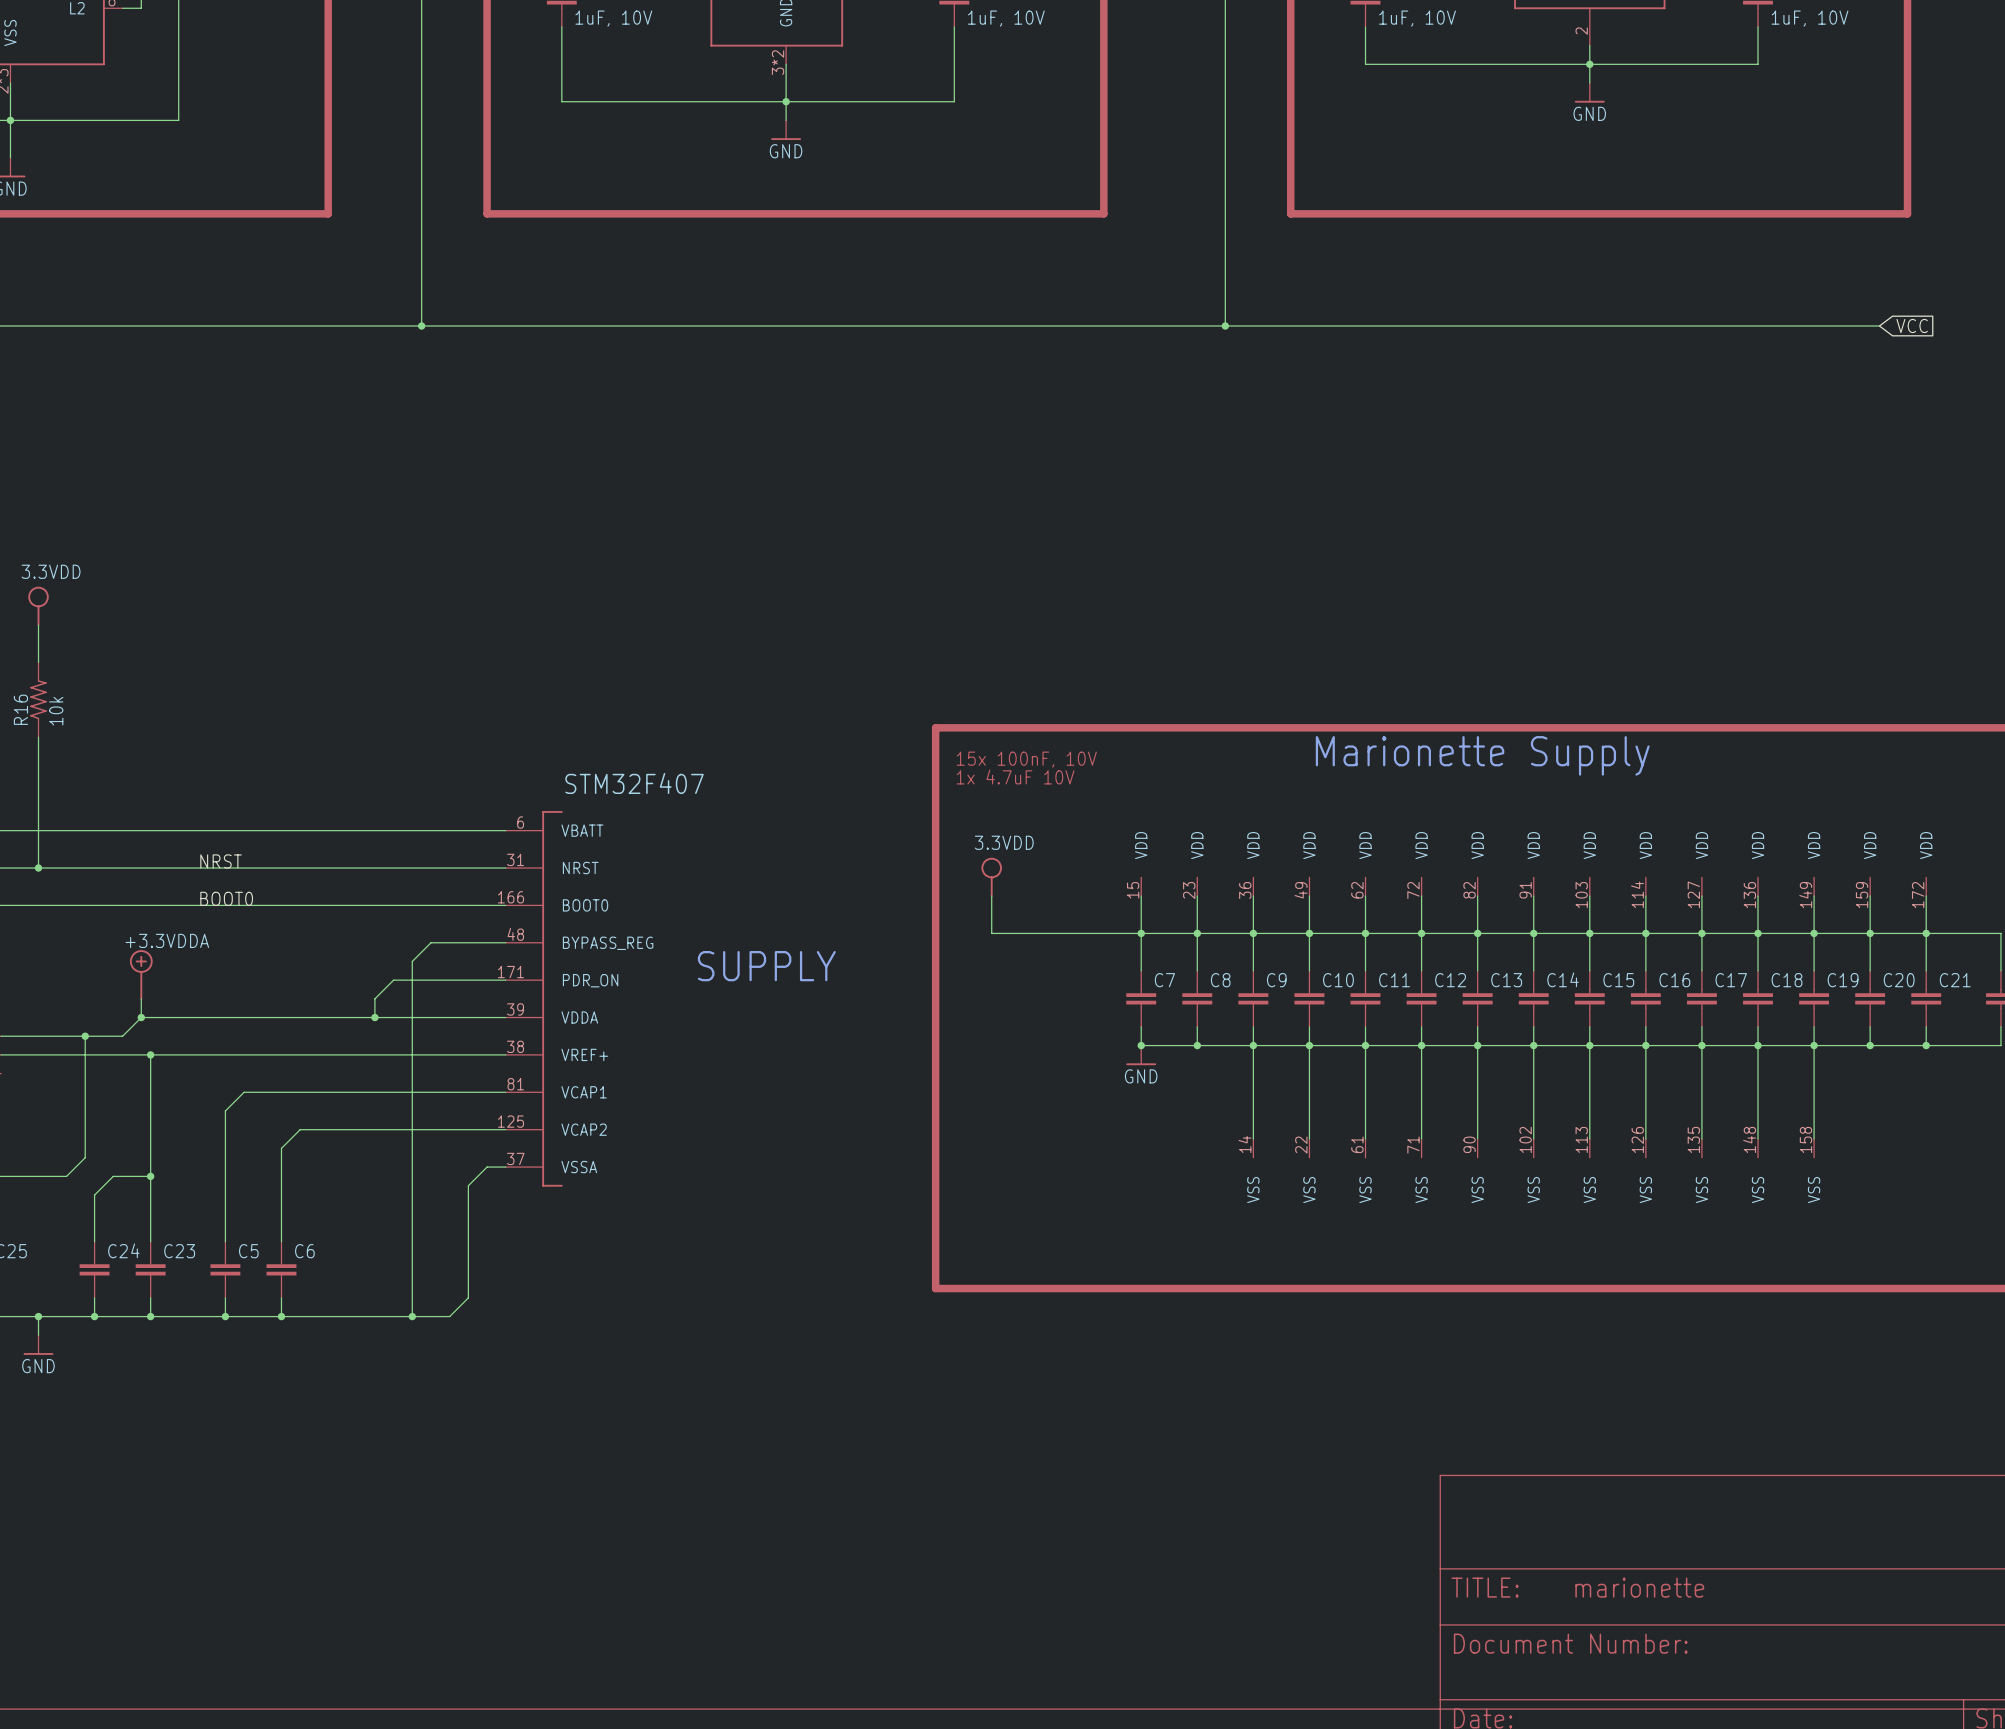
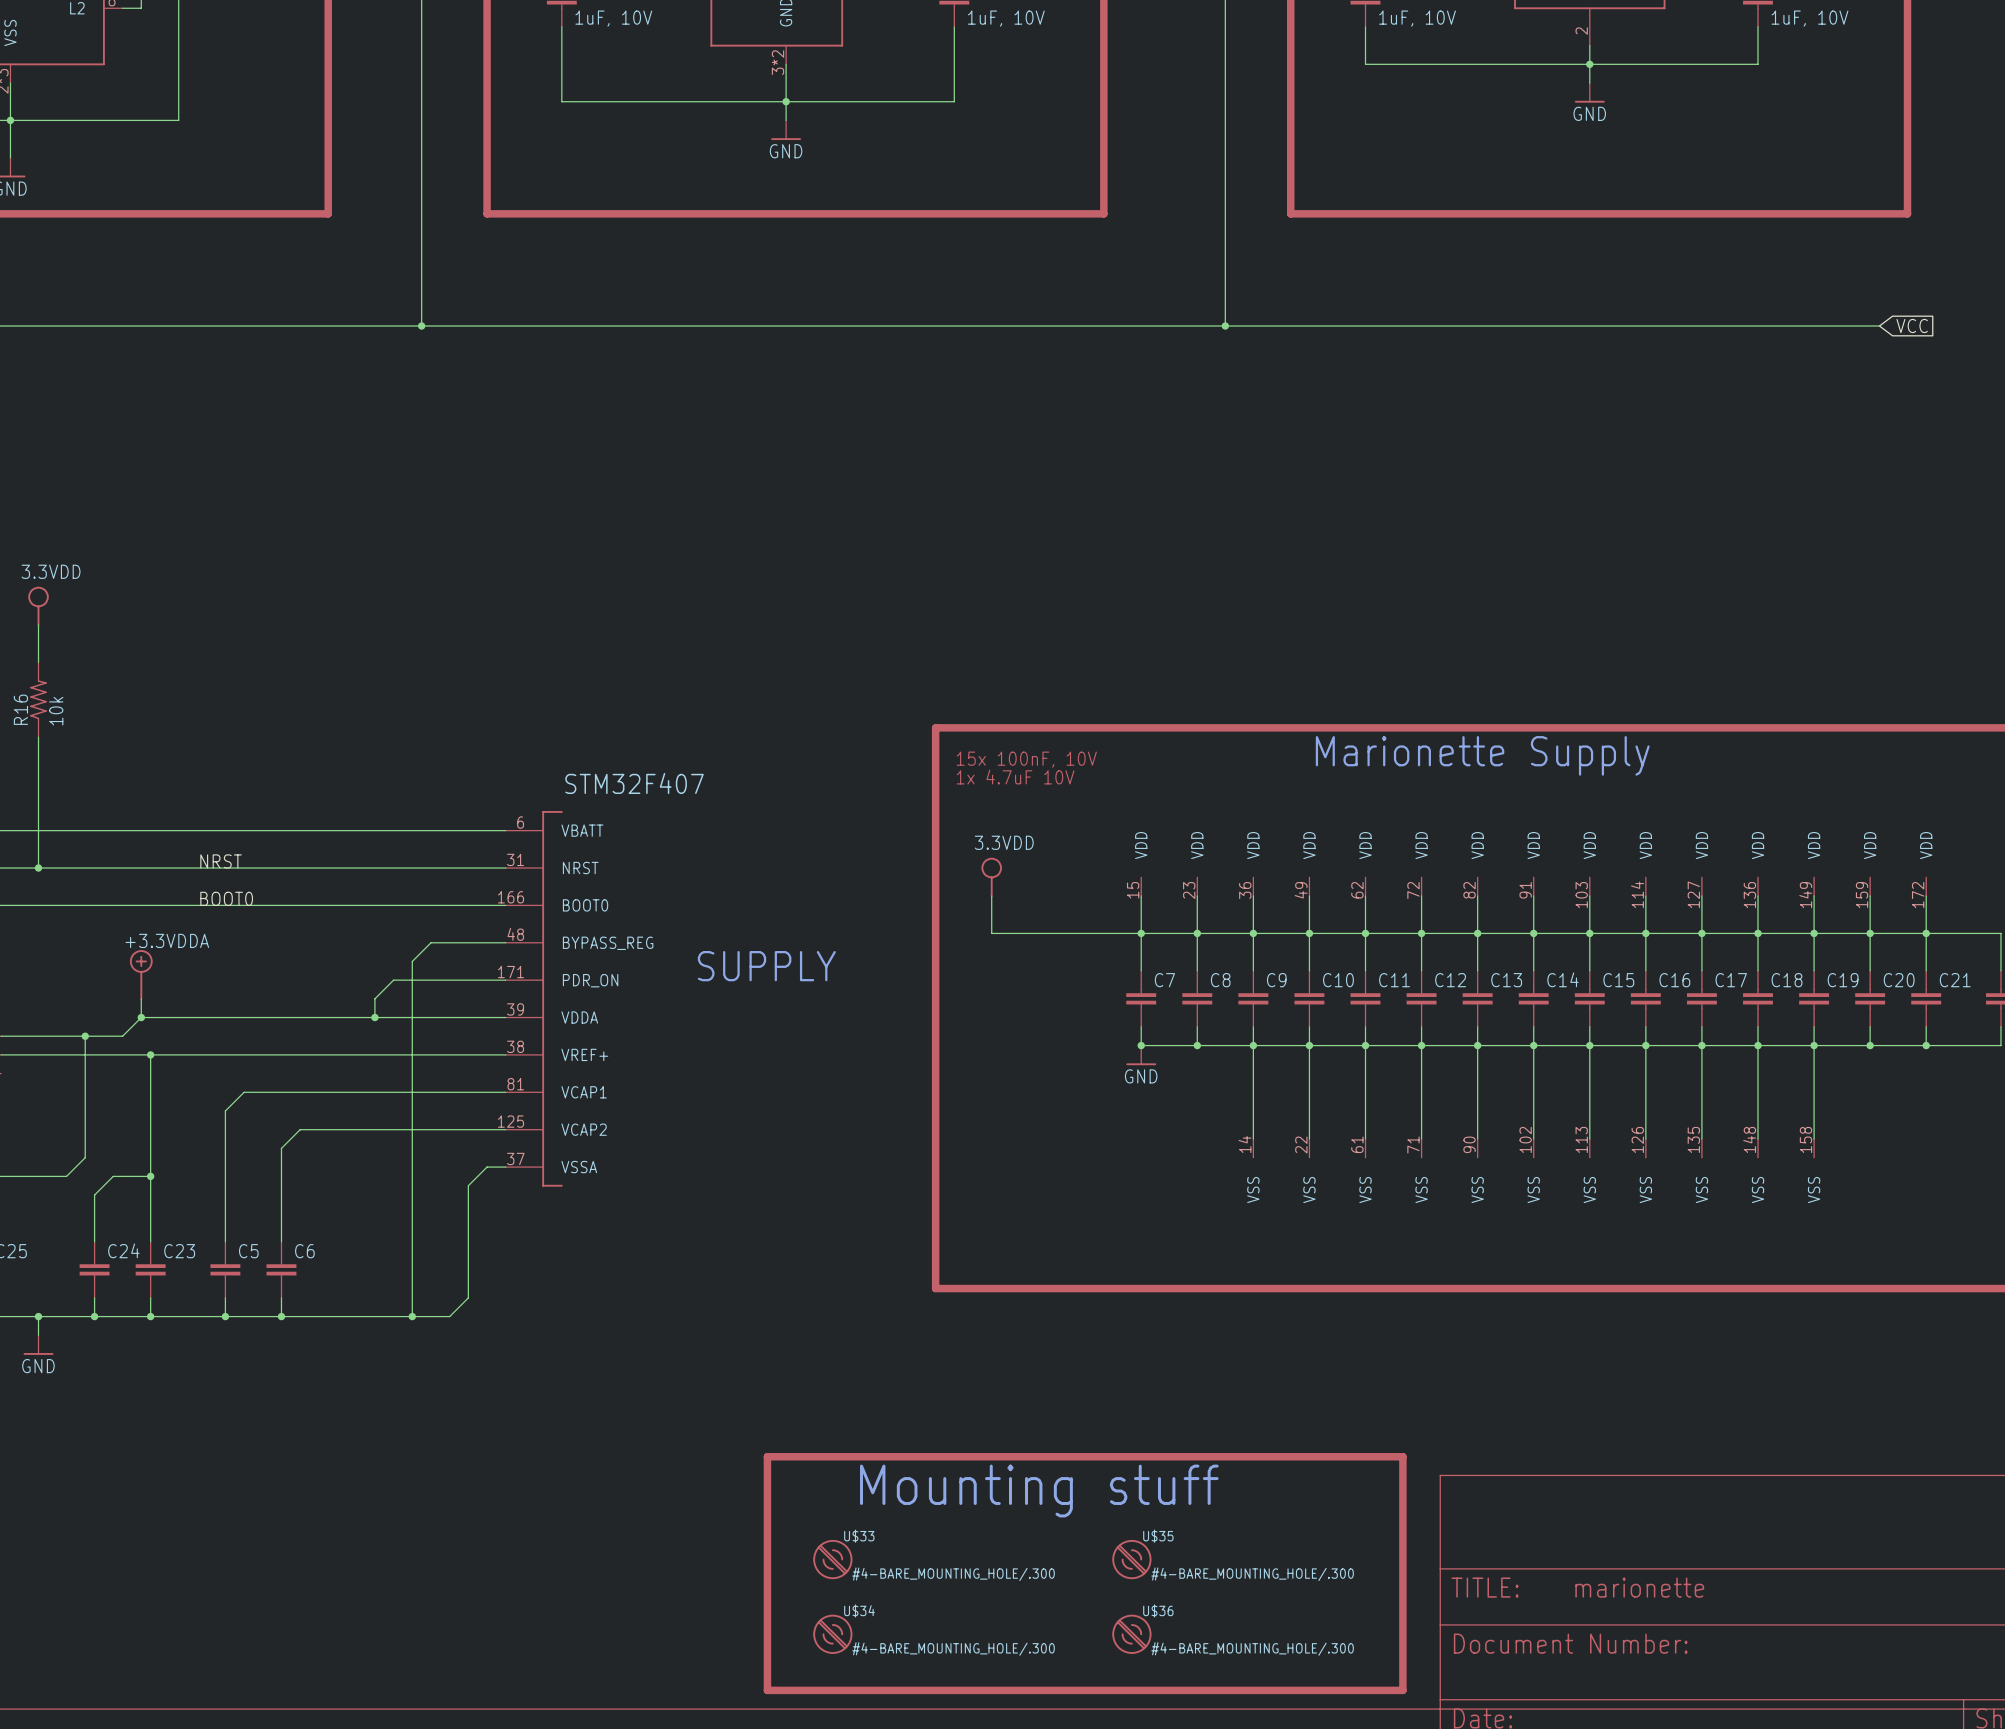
line: none -> (767, 1456) (767, 1690) (1402, 1690) (1402, 1456) (767, 1456)
text: none -> Mounting stuff (1039, 1491)
U$33: none -> #4-BARE_MOUNTING_HOLE/.300 (832, 1559)
U$35: none -> #4-BARE_MOUNTING_HOLE/.300 (1131, 1559)
U$34: none -> #4-BARE_MOUNTING_HOLE/.300 (832, 1634)
U$36: none -> #4-BARE_MOUNTING_HOLE/.300 (1131, 1634)

